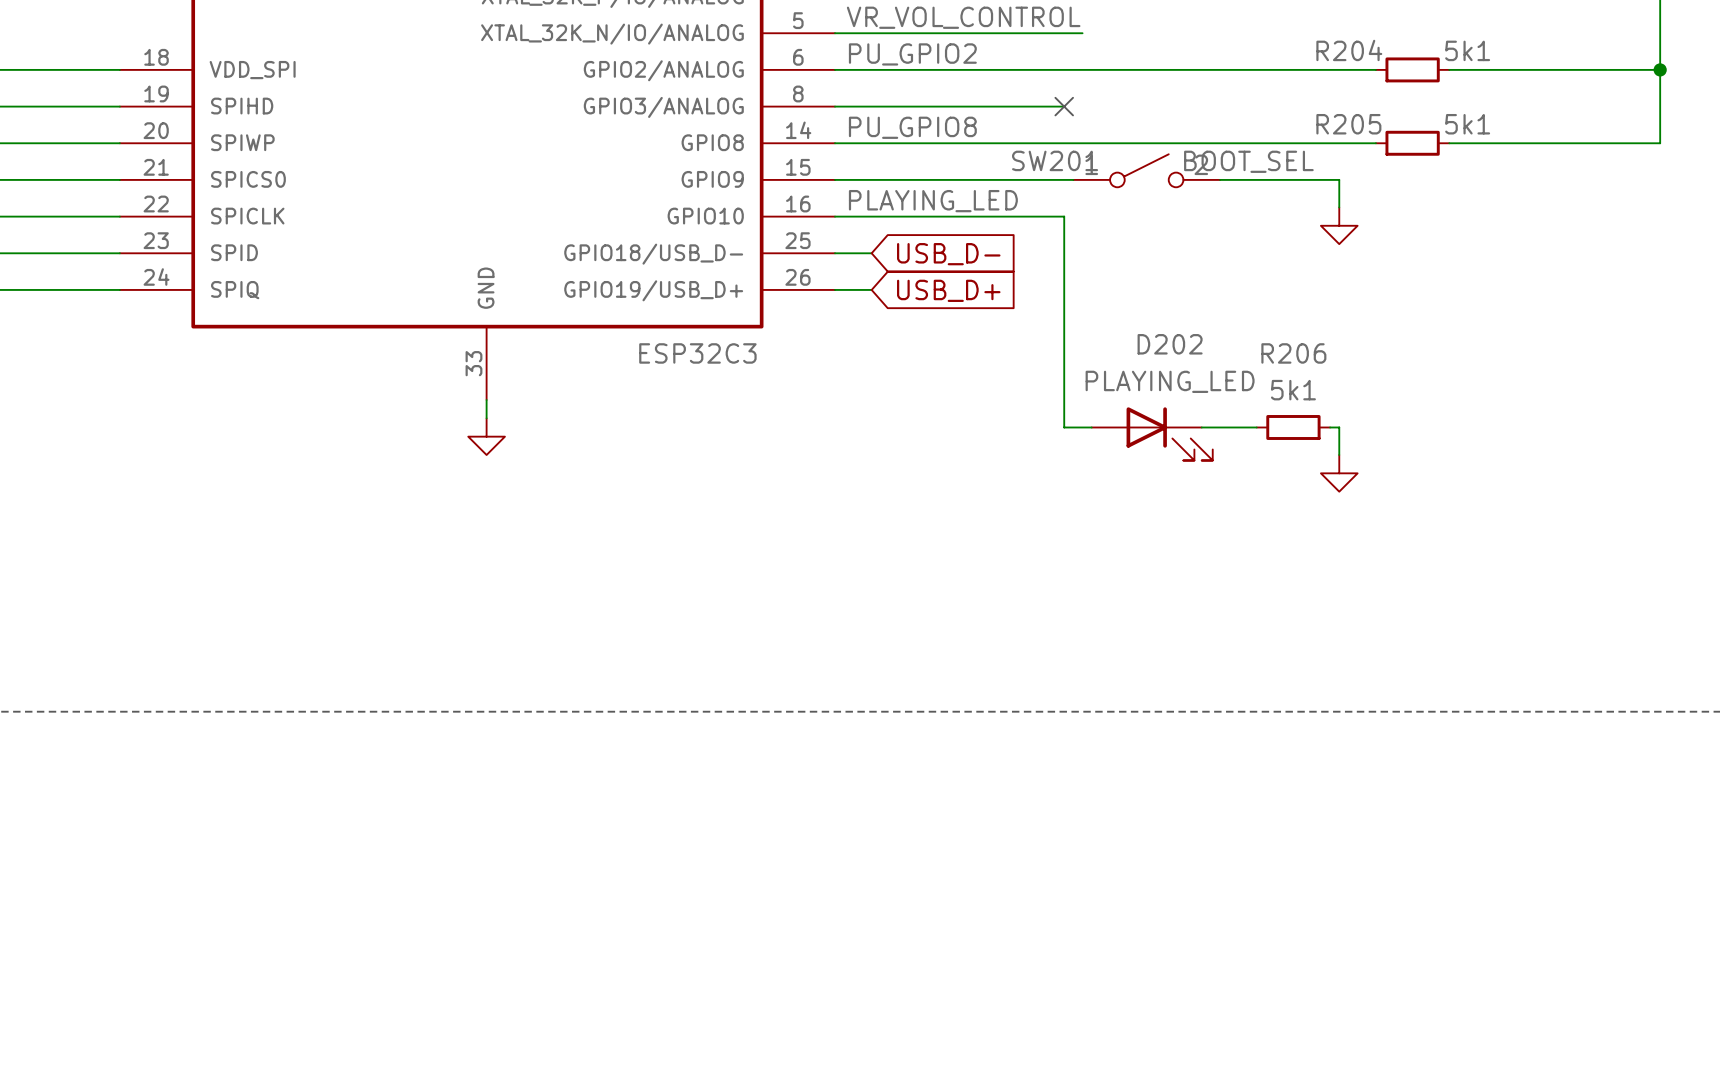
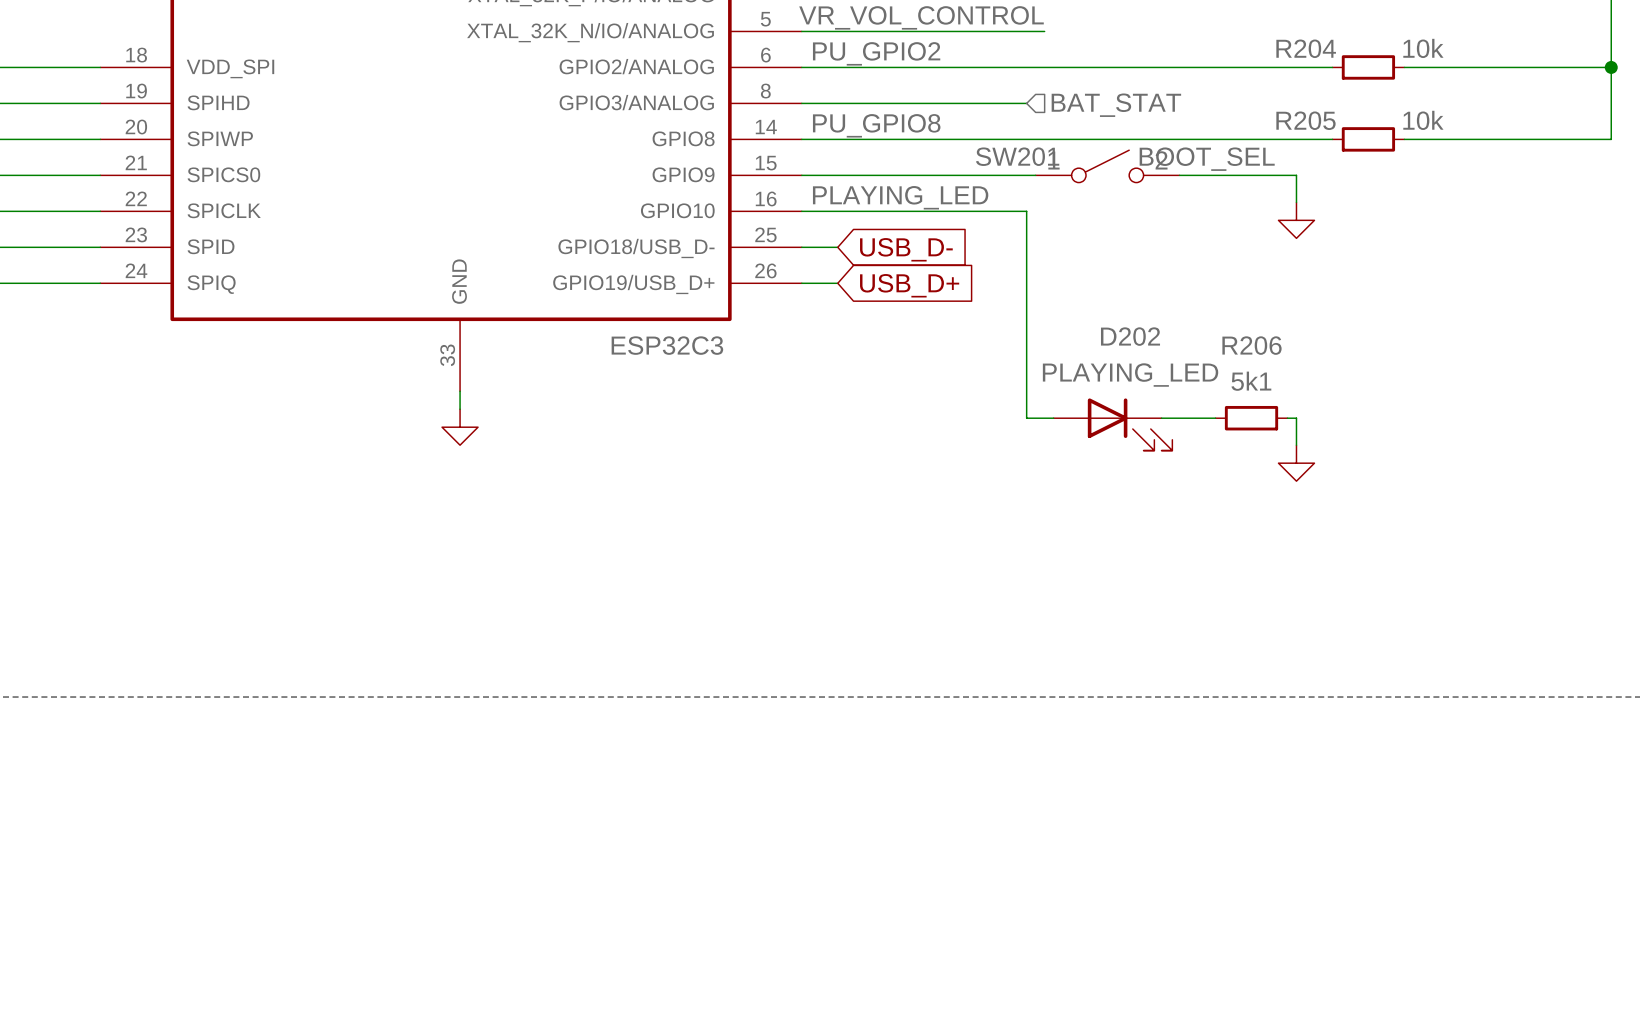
R204 value: 5k1 (1467, 50) -> 10k (1423, 48)
no-connect mark: (1064, 106) -> none
hierarchical label: none -> BAT_STAT (1116, 105)
R205 value: 5k1 (1467, 124) -> 10k (1423, 120)

